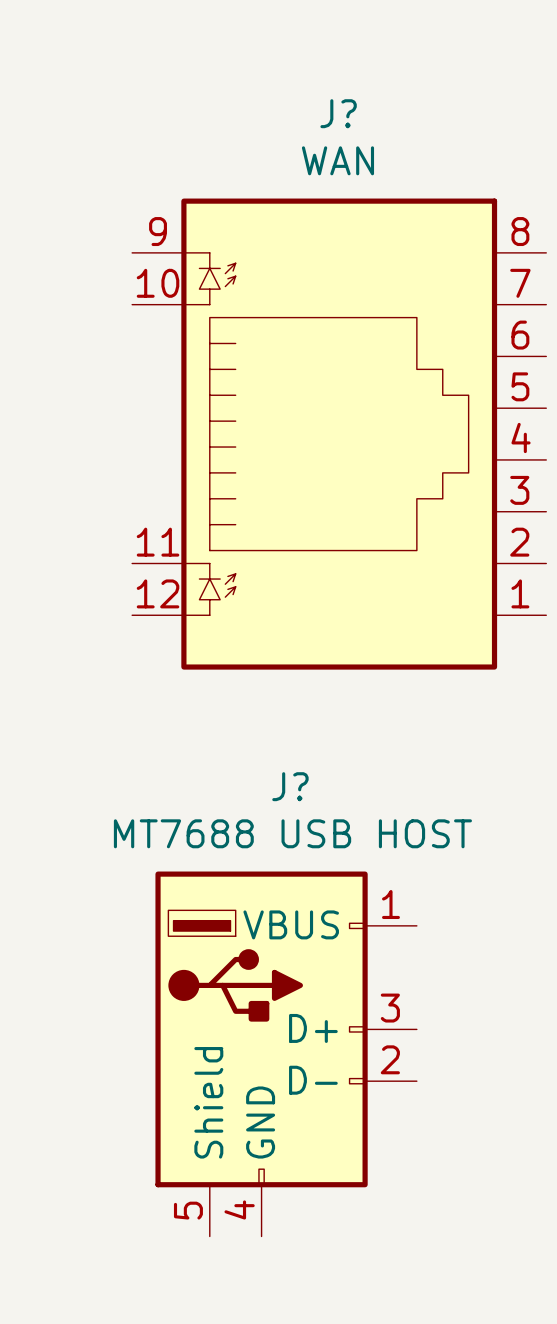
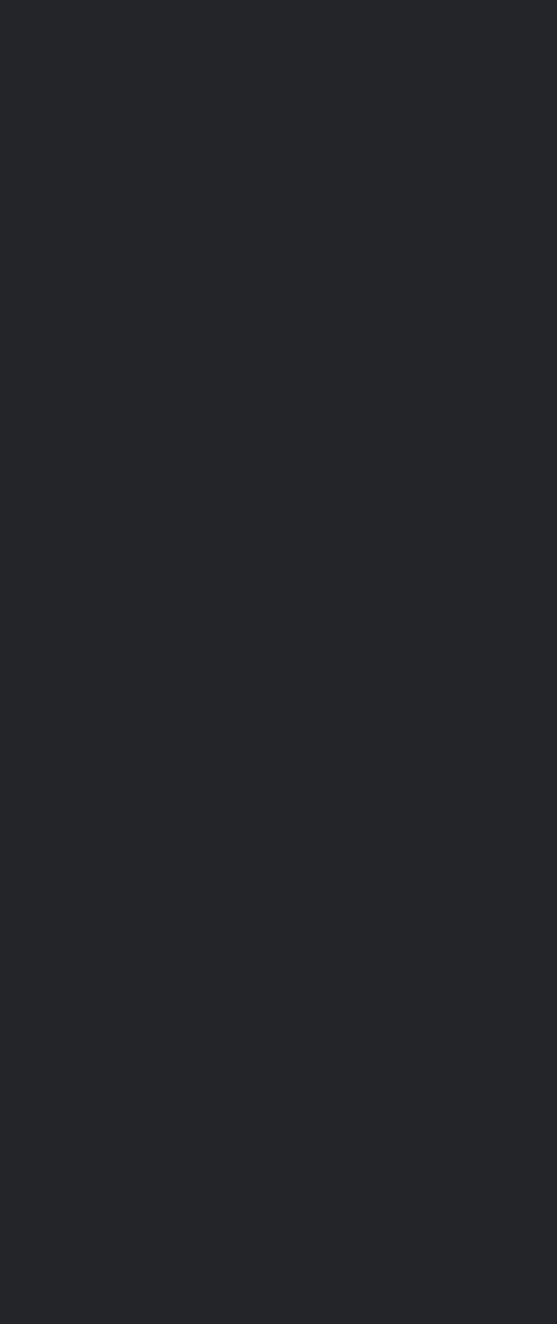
J?: WAN (339, 434) -> none
J?: MT7688 USB HOST (286, 1054) -> none

